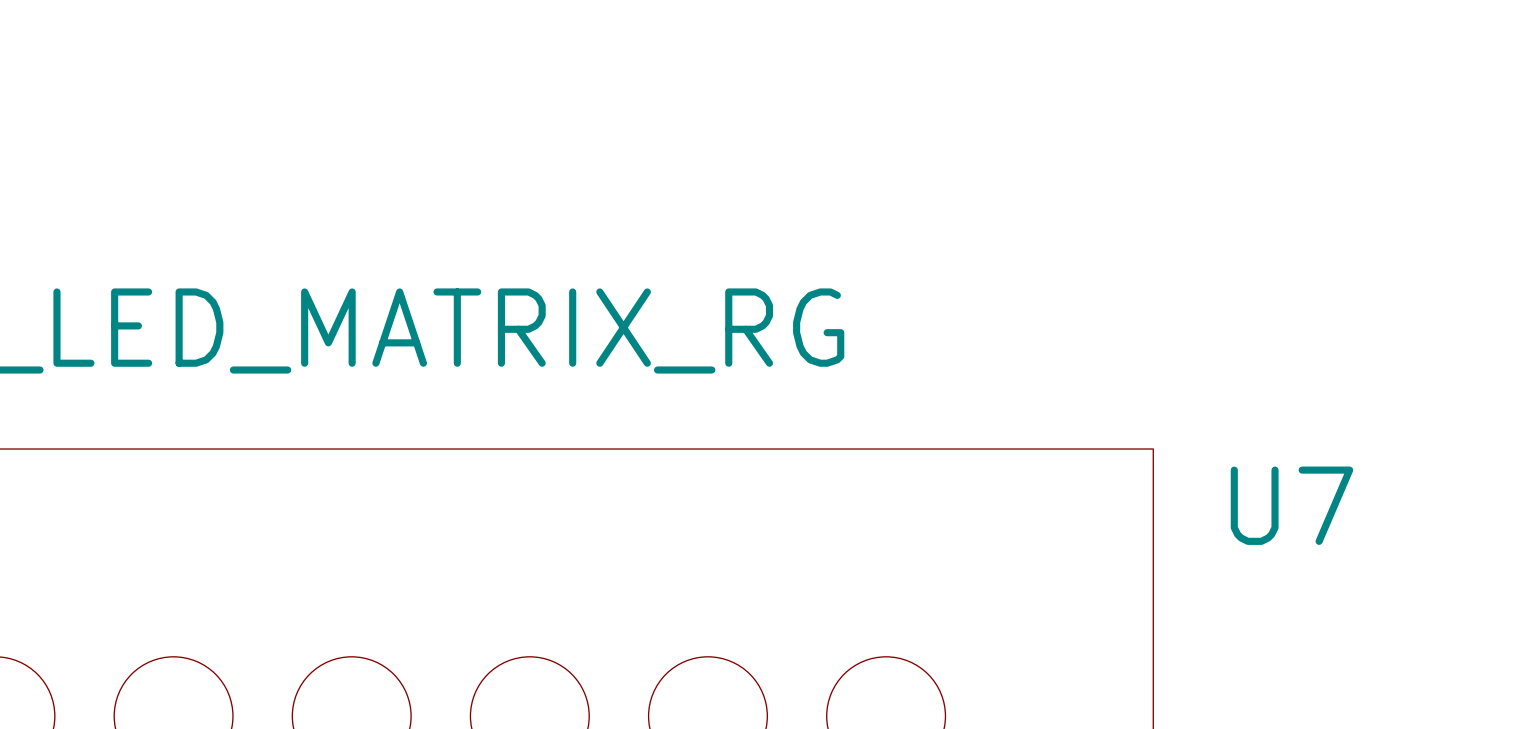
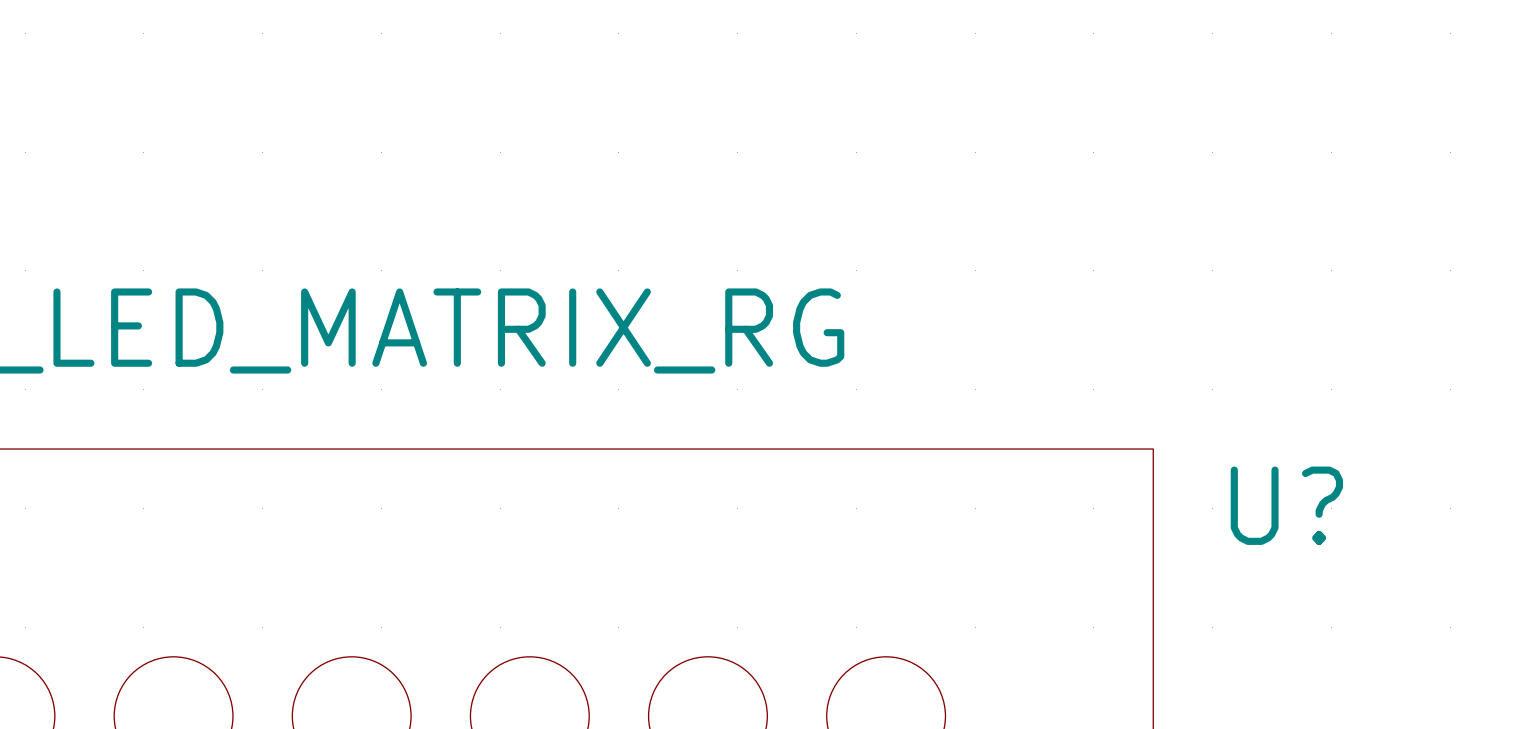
U7 name: U7 (1291, 505) -> U? (1286, 505)

